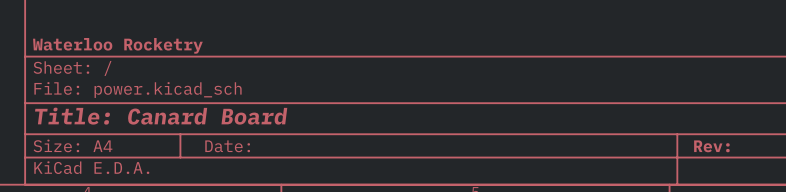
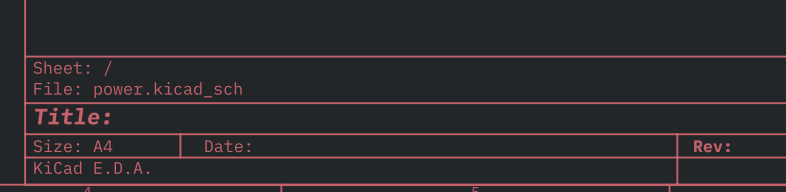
title block: Waterloo Rocketry (117, 45) -> none
title block: Title: Canard Board (161, 116) -> Title: (72, 116)

